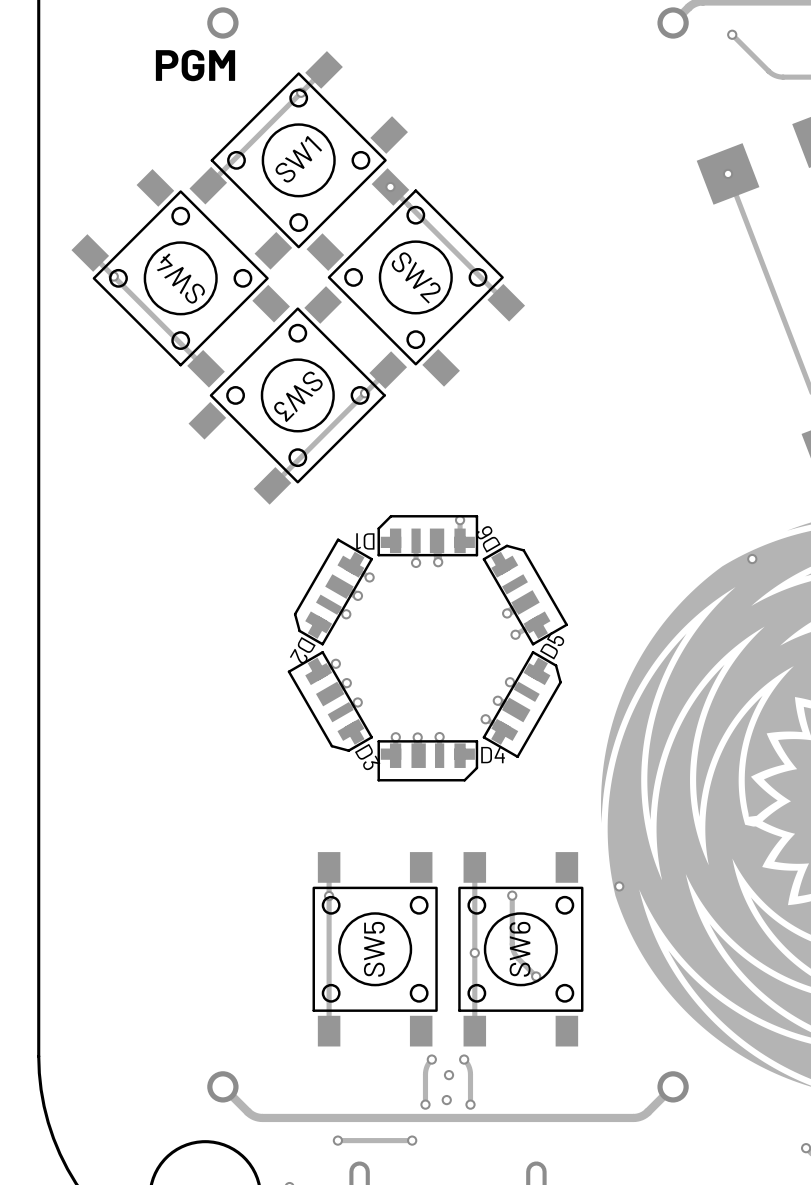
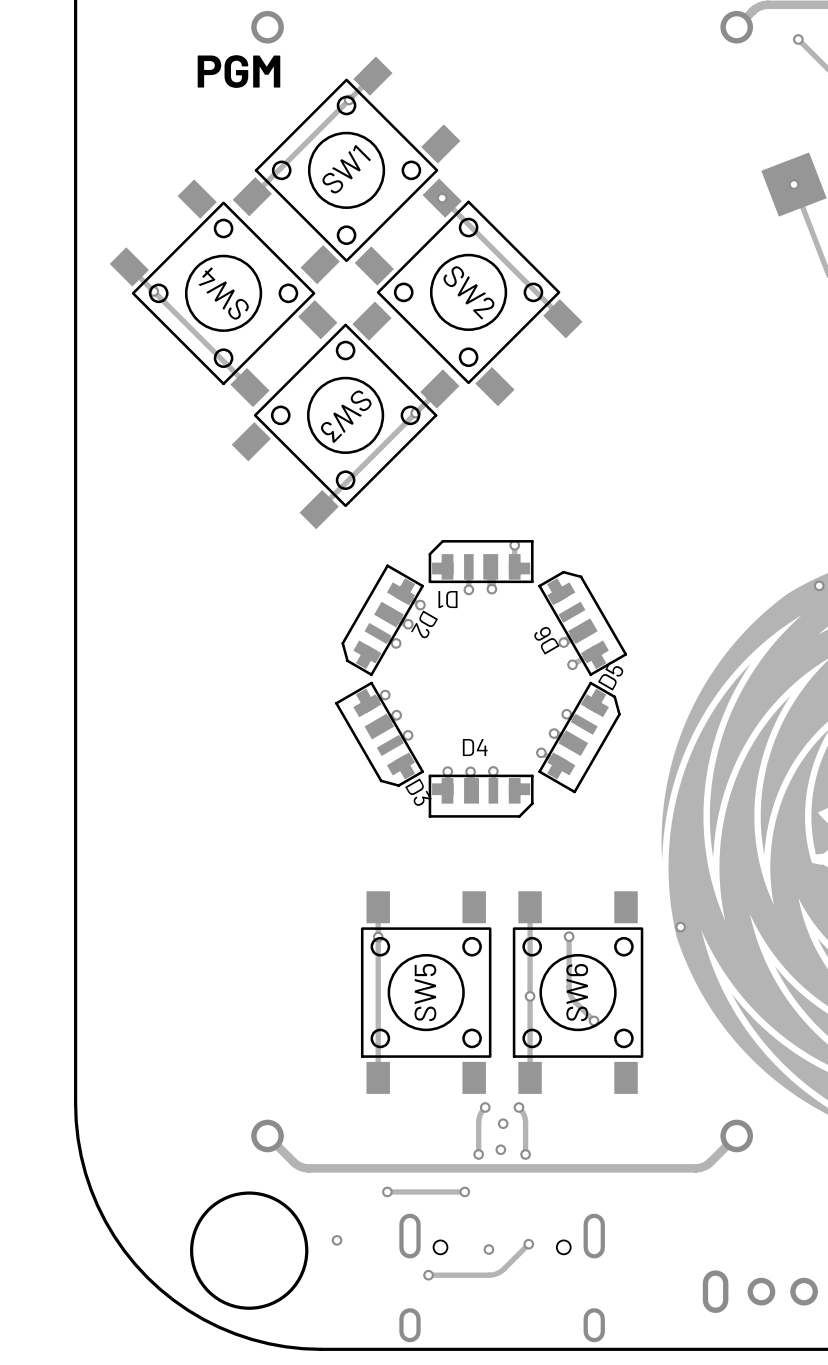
D6 name position: D6 (488, 539) -> D6 (546, 640)
D1 name position: D1 (365, 541) -> D1 (447, 599)
D2 name position: D2 (302, 650) -> D2 (424, 624)
D4 name position: D4 (493, 755) -> D4 (475, 747)

